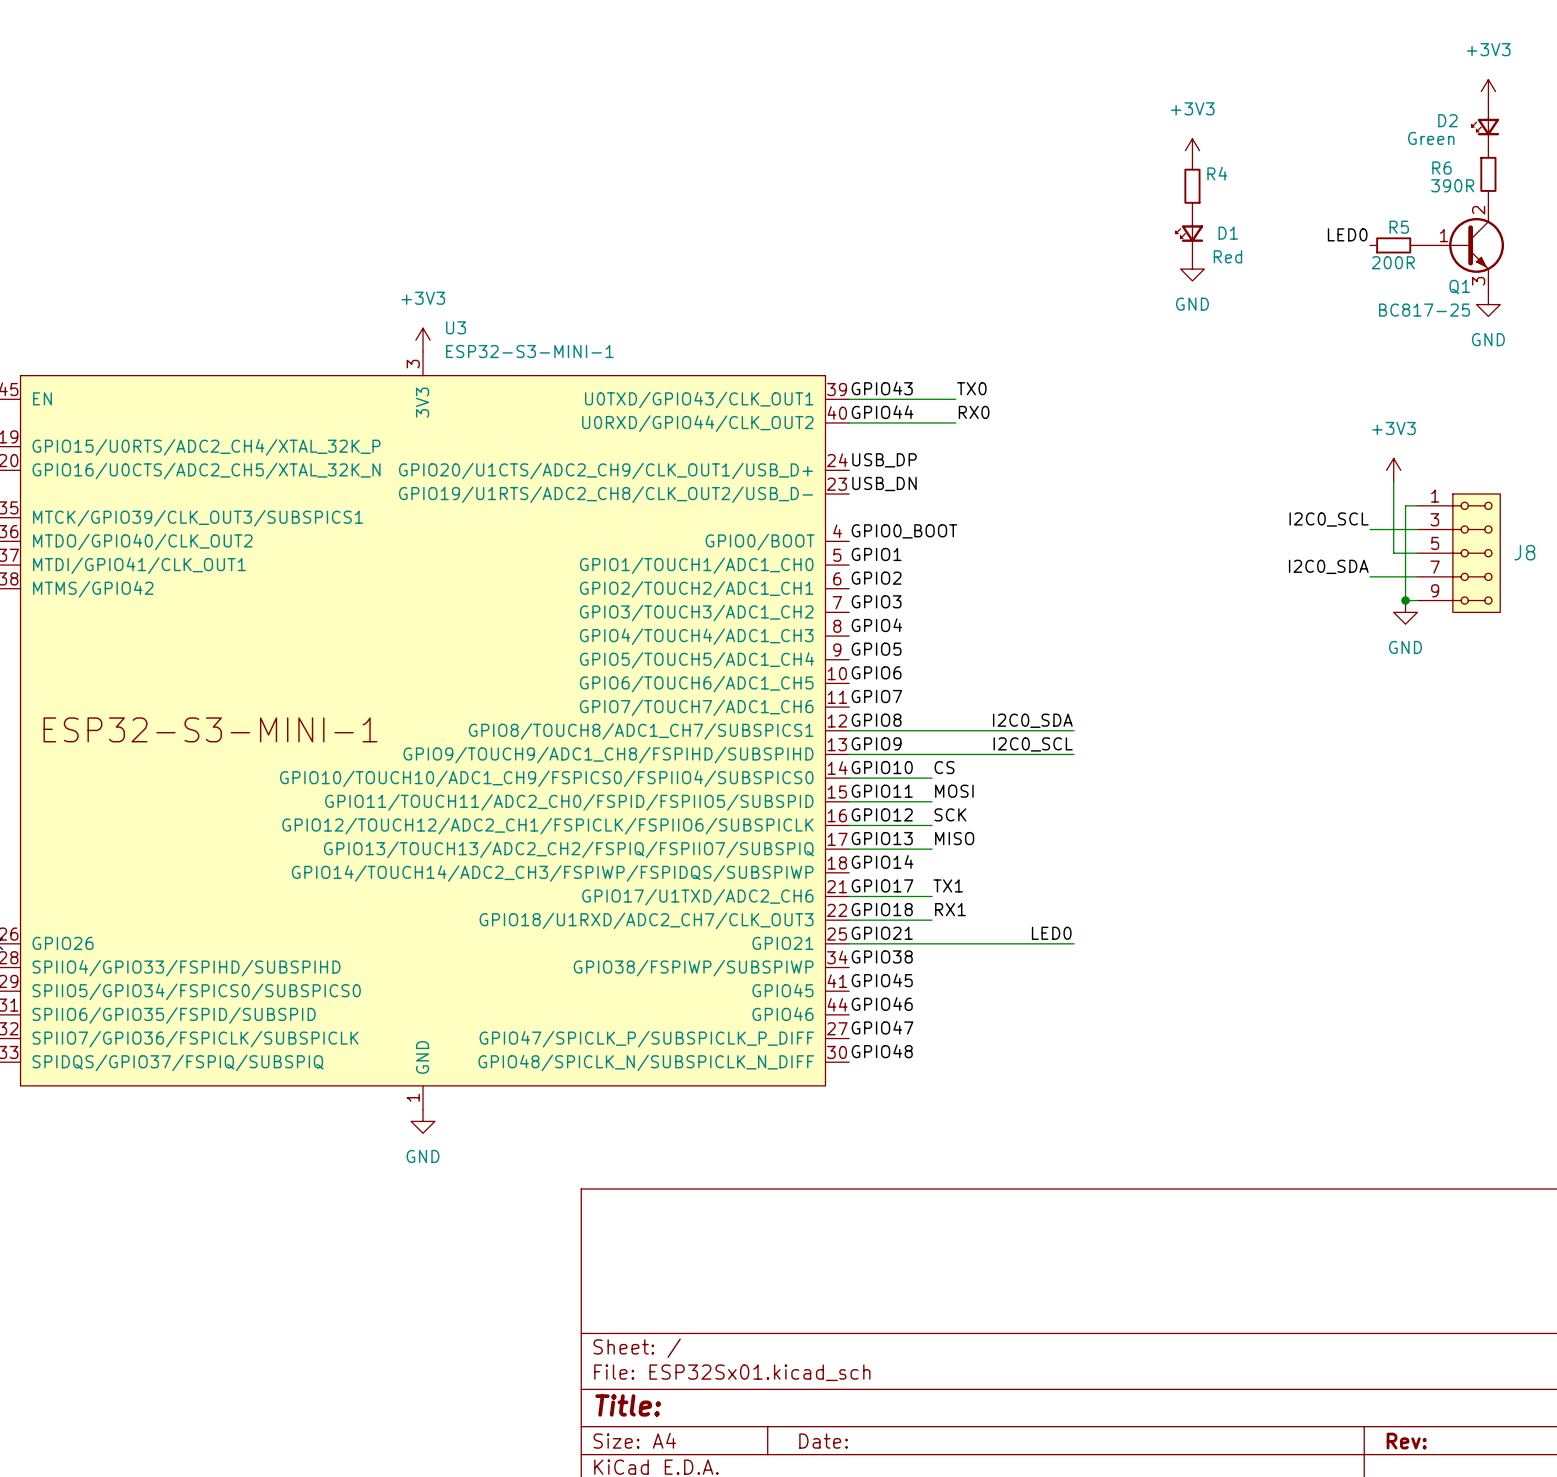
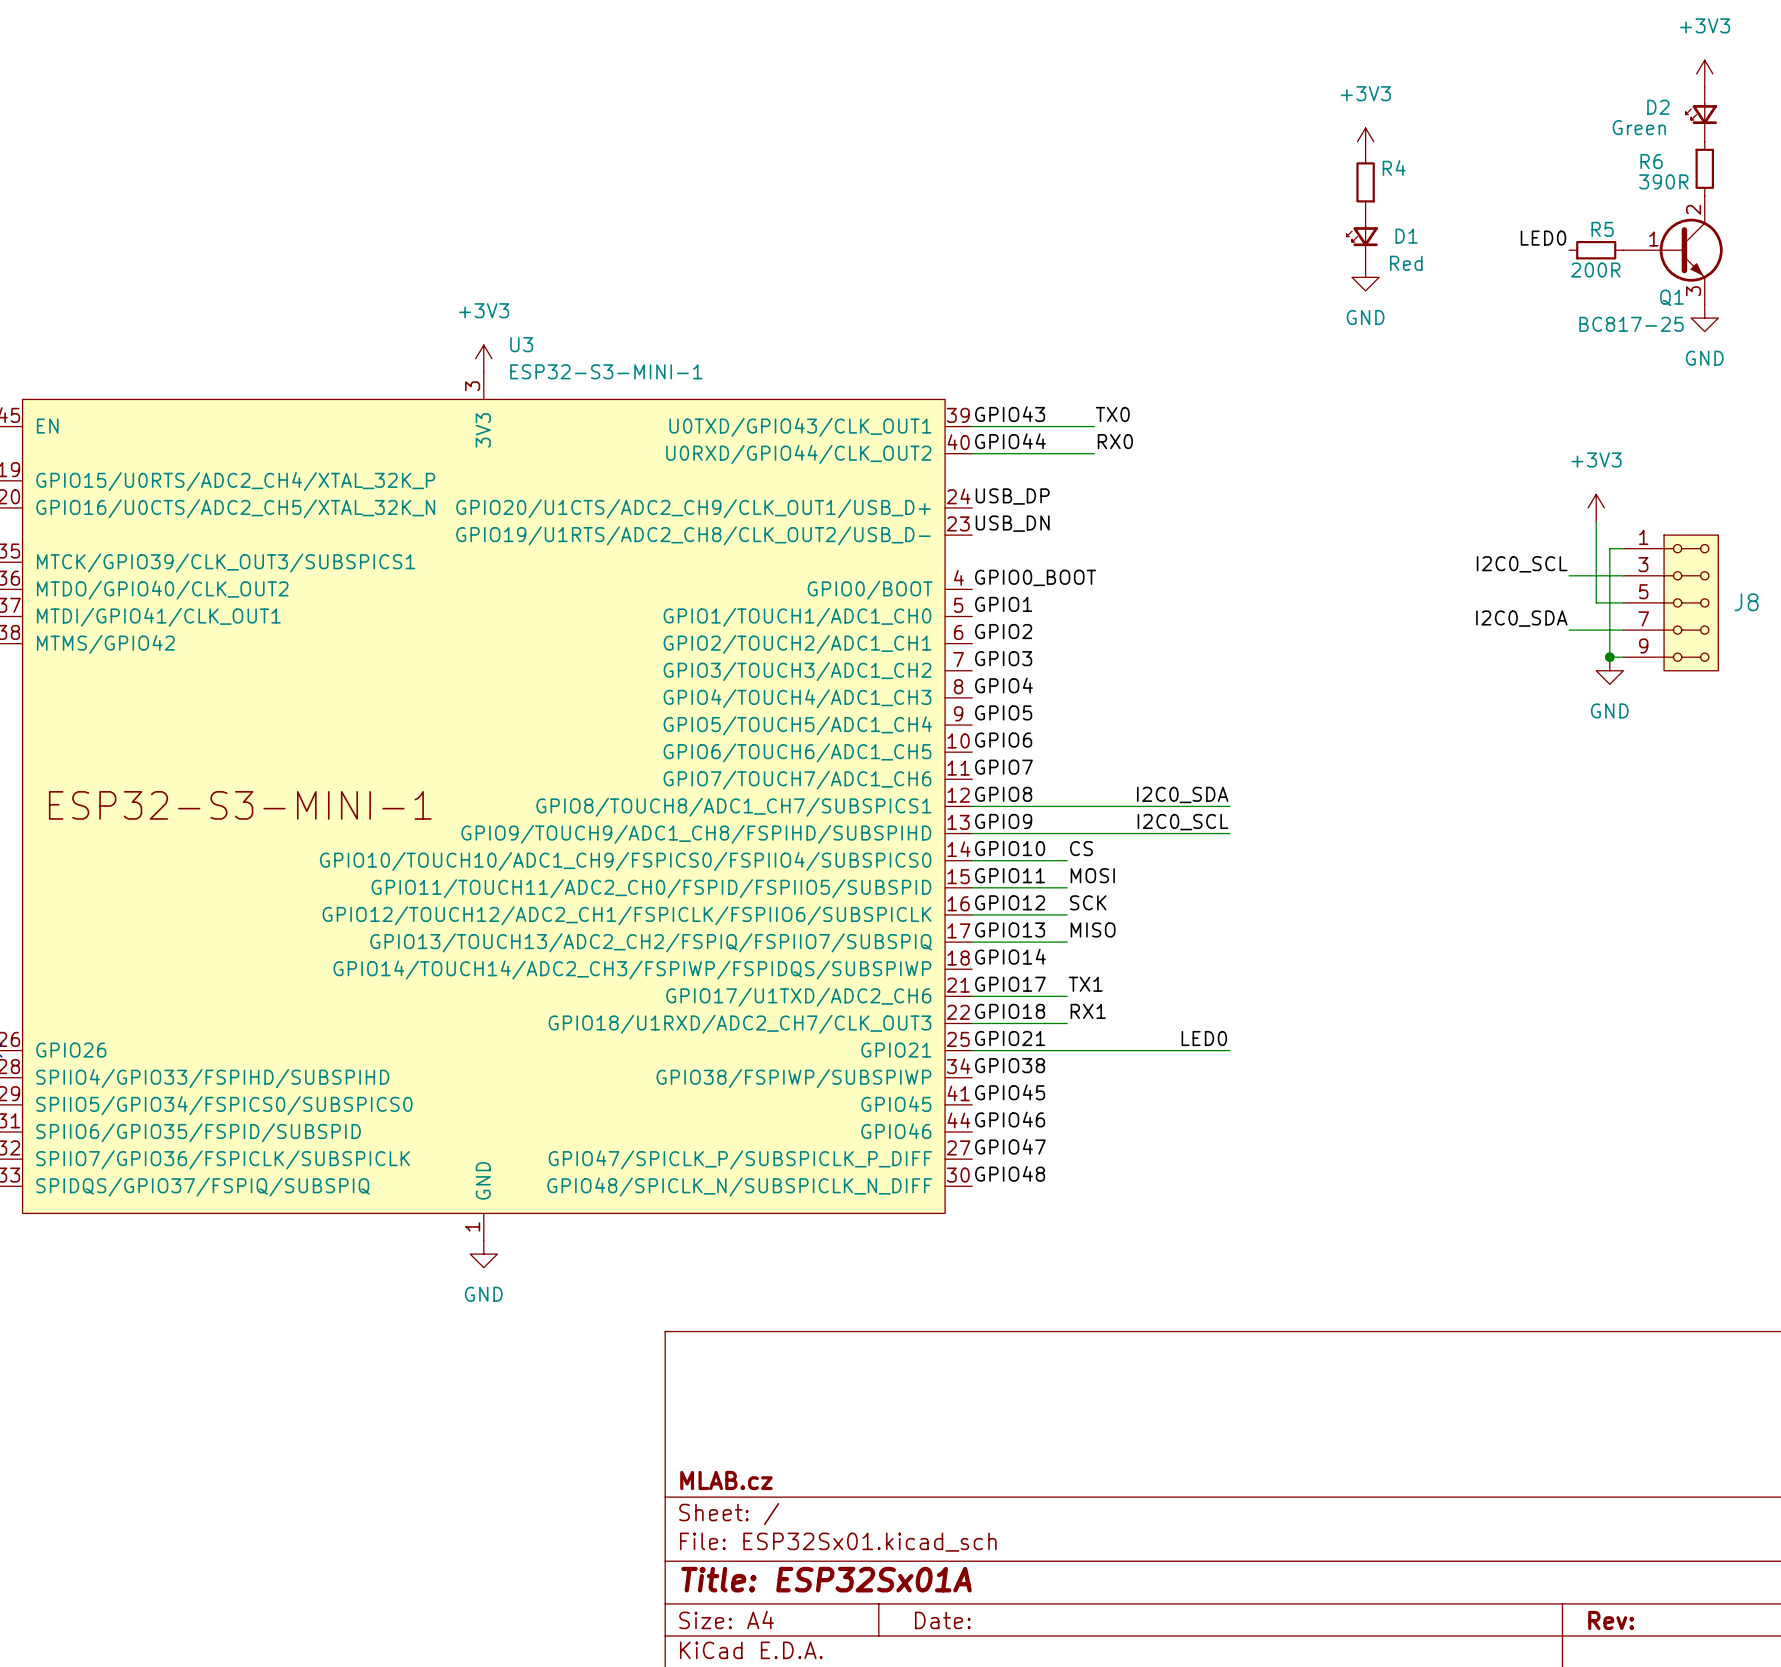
title block: none -> MLAB.cz (726, 1480)
title block: Title: (628, 1405) -> Title: ESP32Sx01A (826, 1579)

